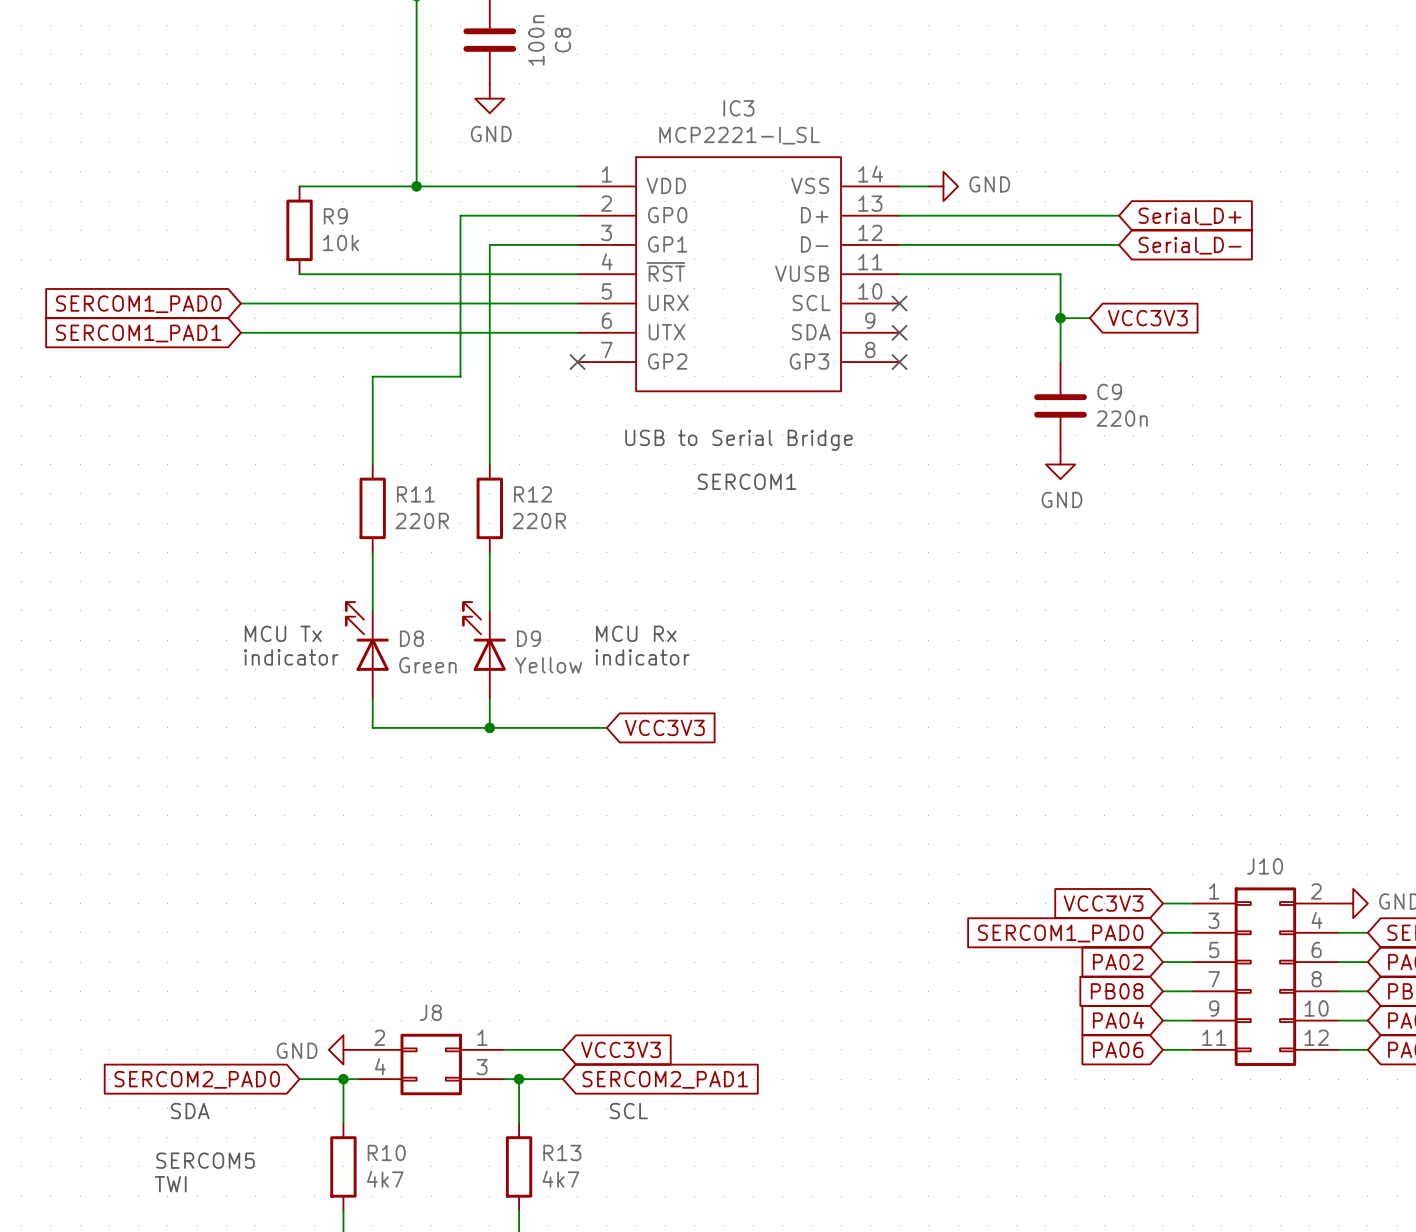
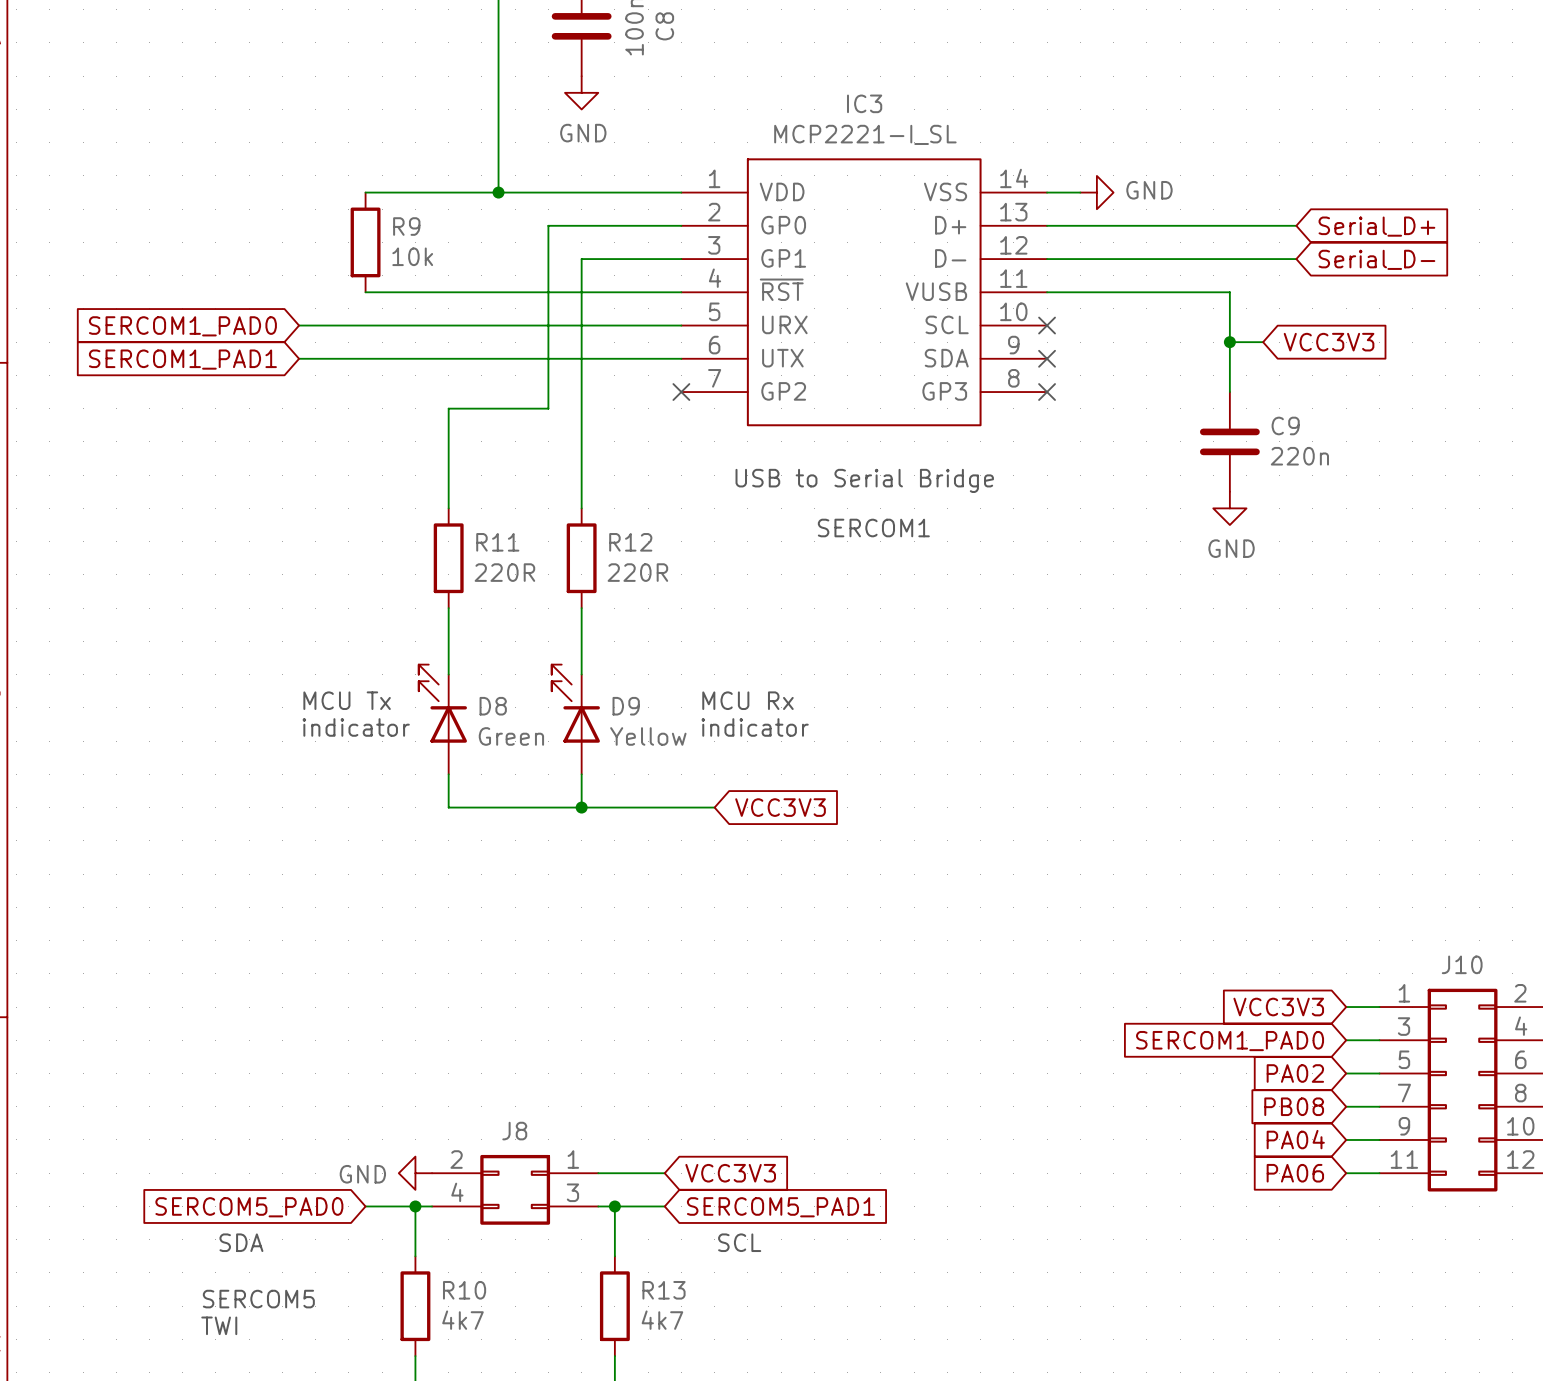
global label: SERCOM2_PAD0 (197, 1079) -> SERCOM5_PAD0 (249, 1207)
global label: SERCOM2_PAD1 (665, 1079) -> SERCOM5_PAD1 (780, 1207)

